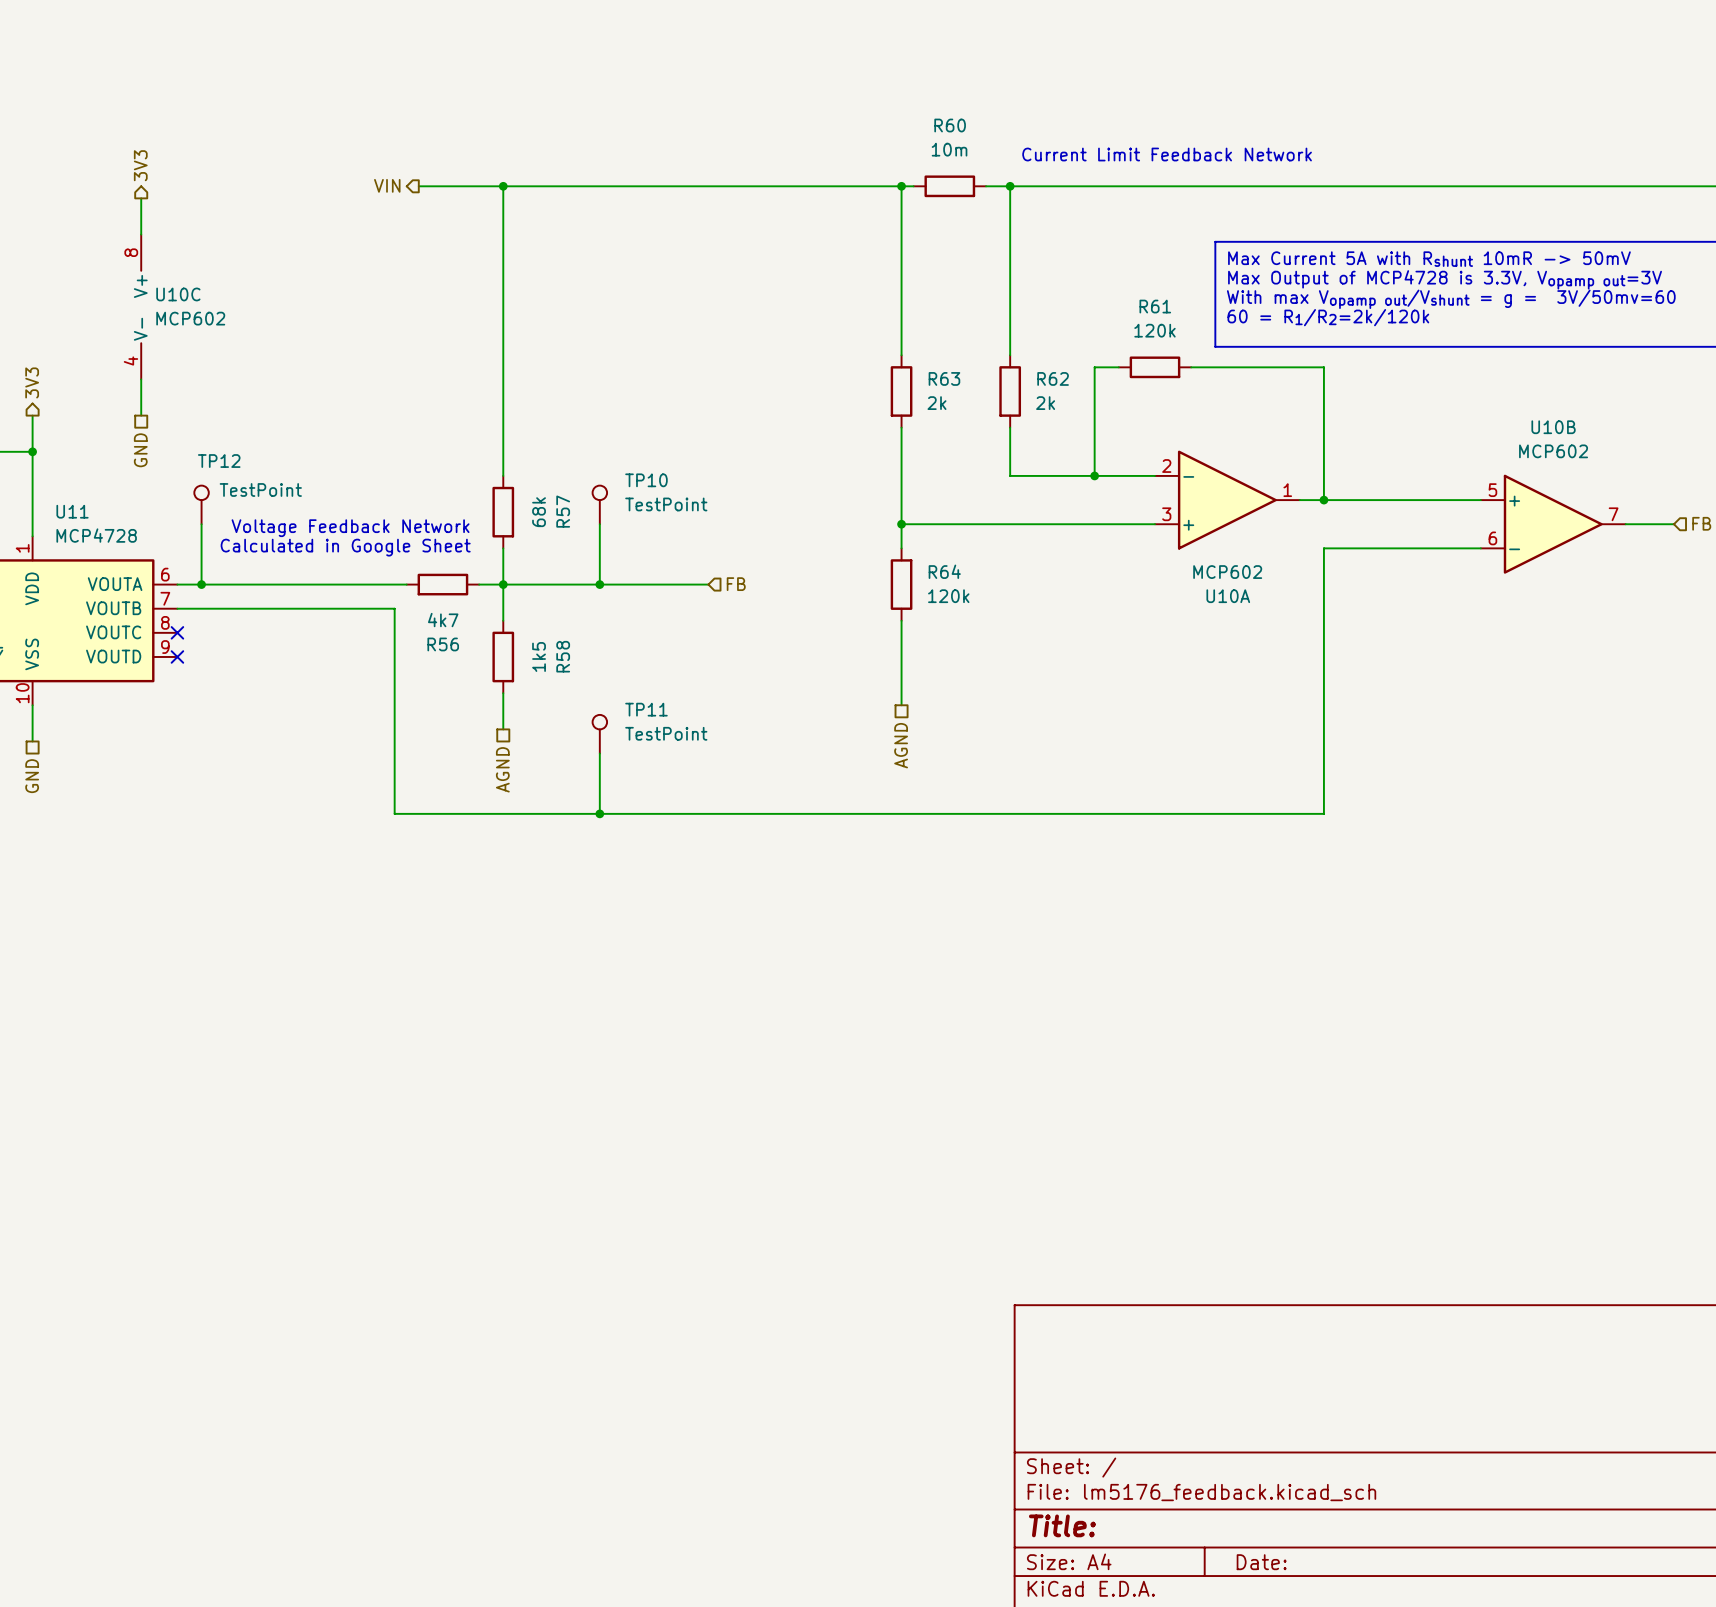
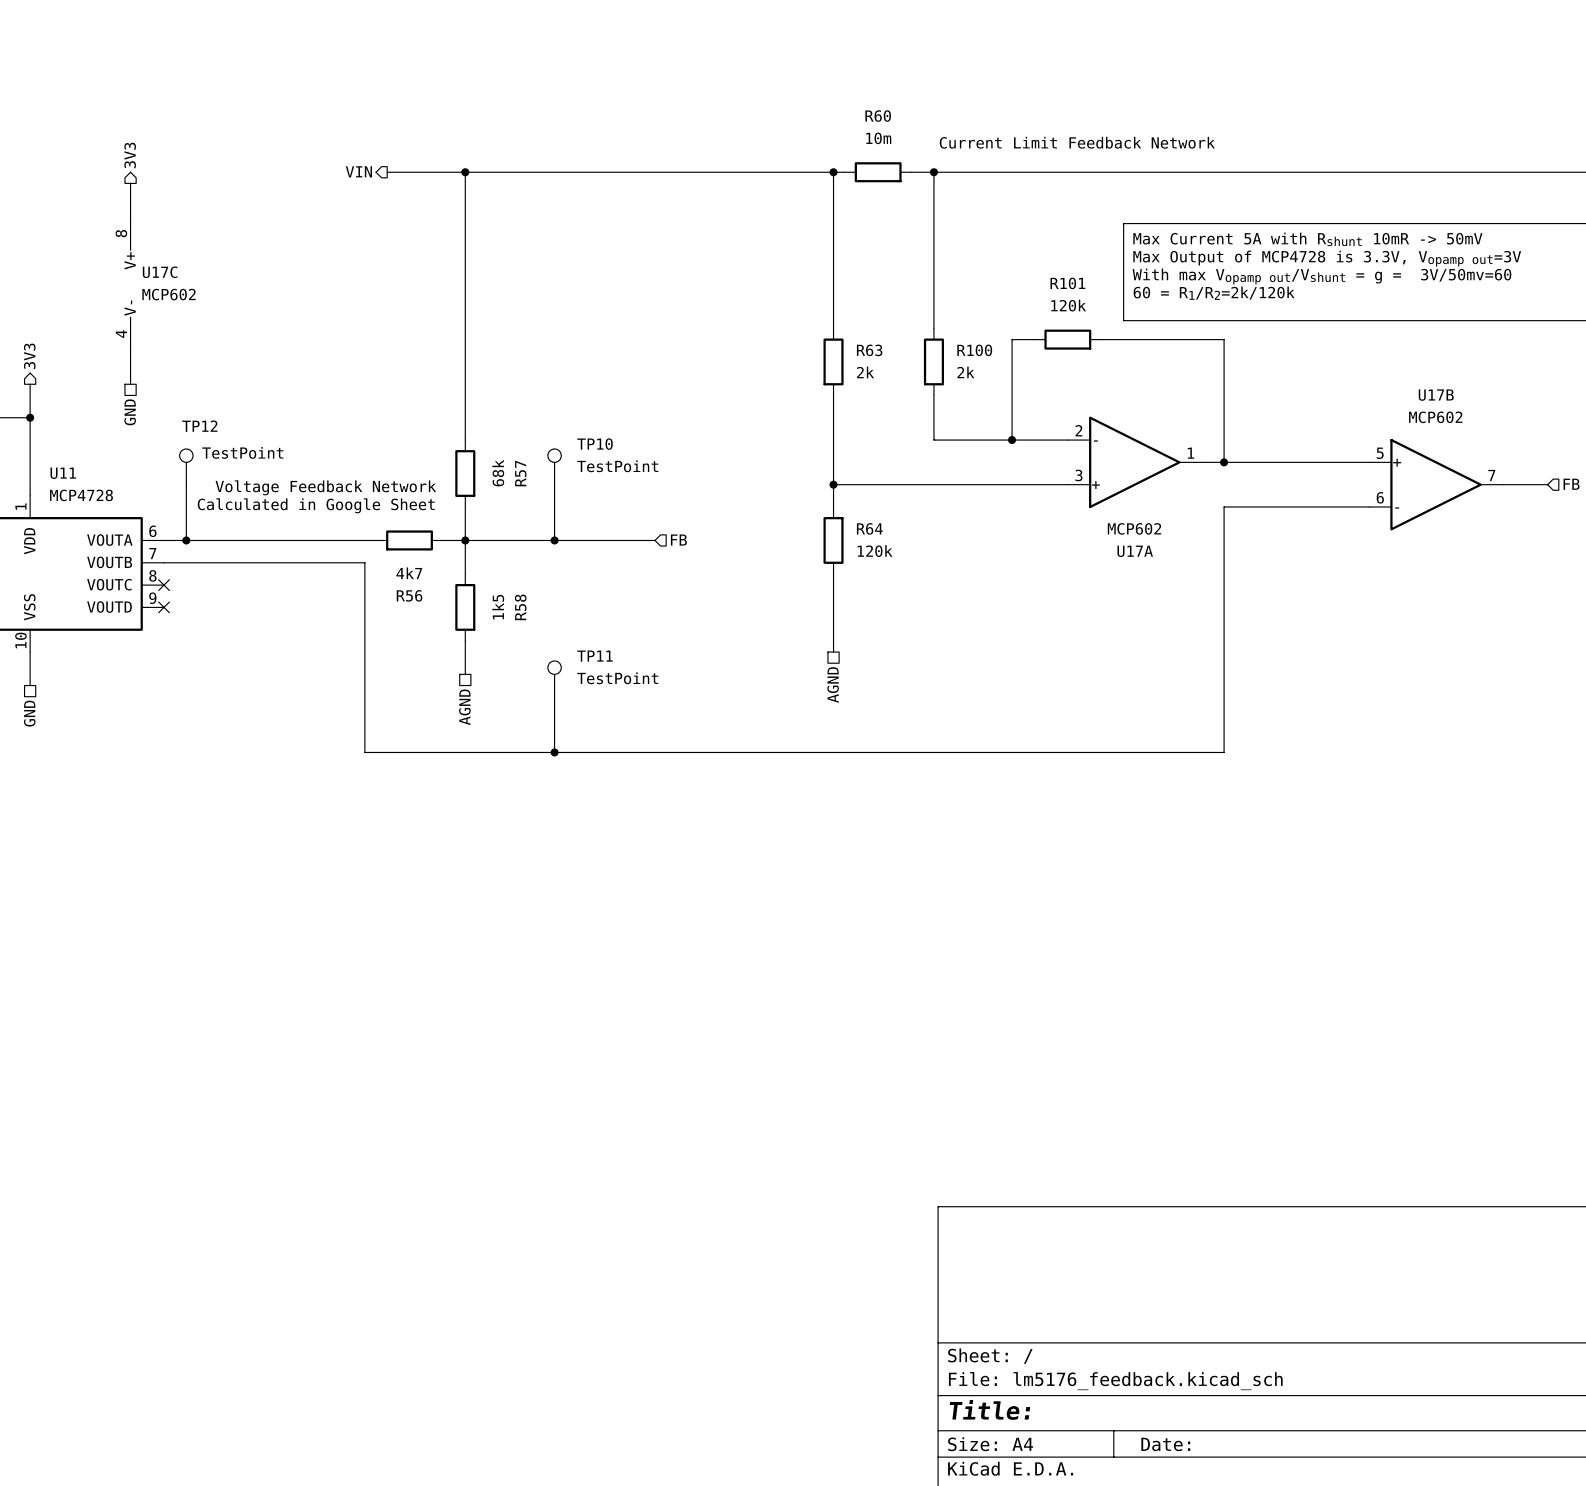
U10C name: U10C (178, 294) -> U17C (160, 272)
R61 name: R61 (1155, 306) -> R101 (1067, 283)
R62 name: R62 (1053, 378) -> R100 (974, 350)
U10B name: U10B (1553, 427) -> U17B (1436, 395)
U10A name: U10A (1228, 596) -> U17A (1135, 551)

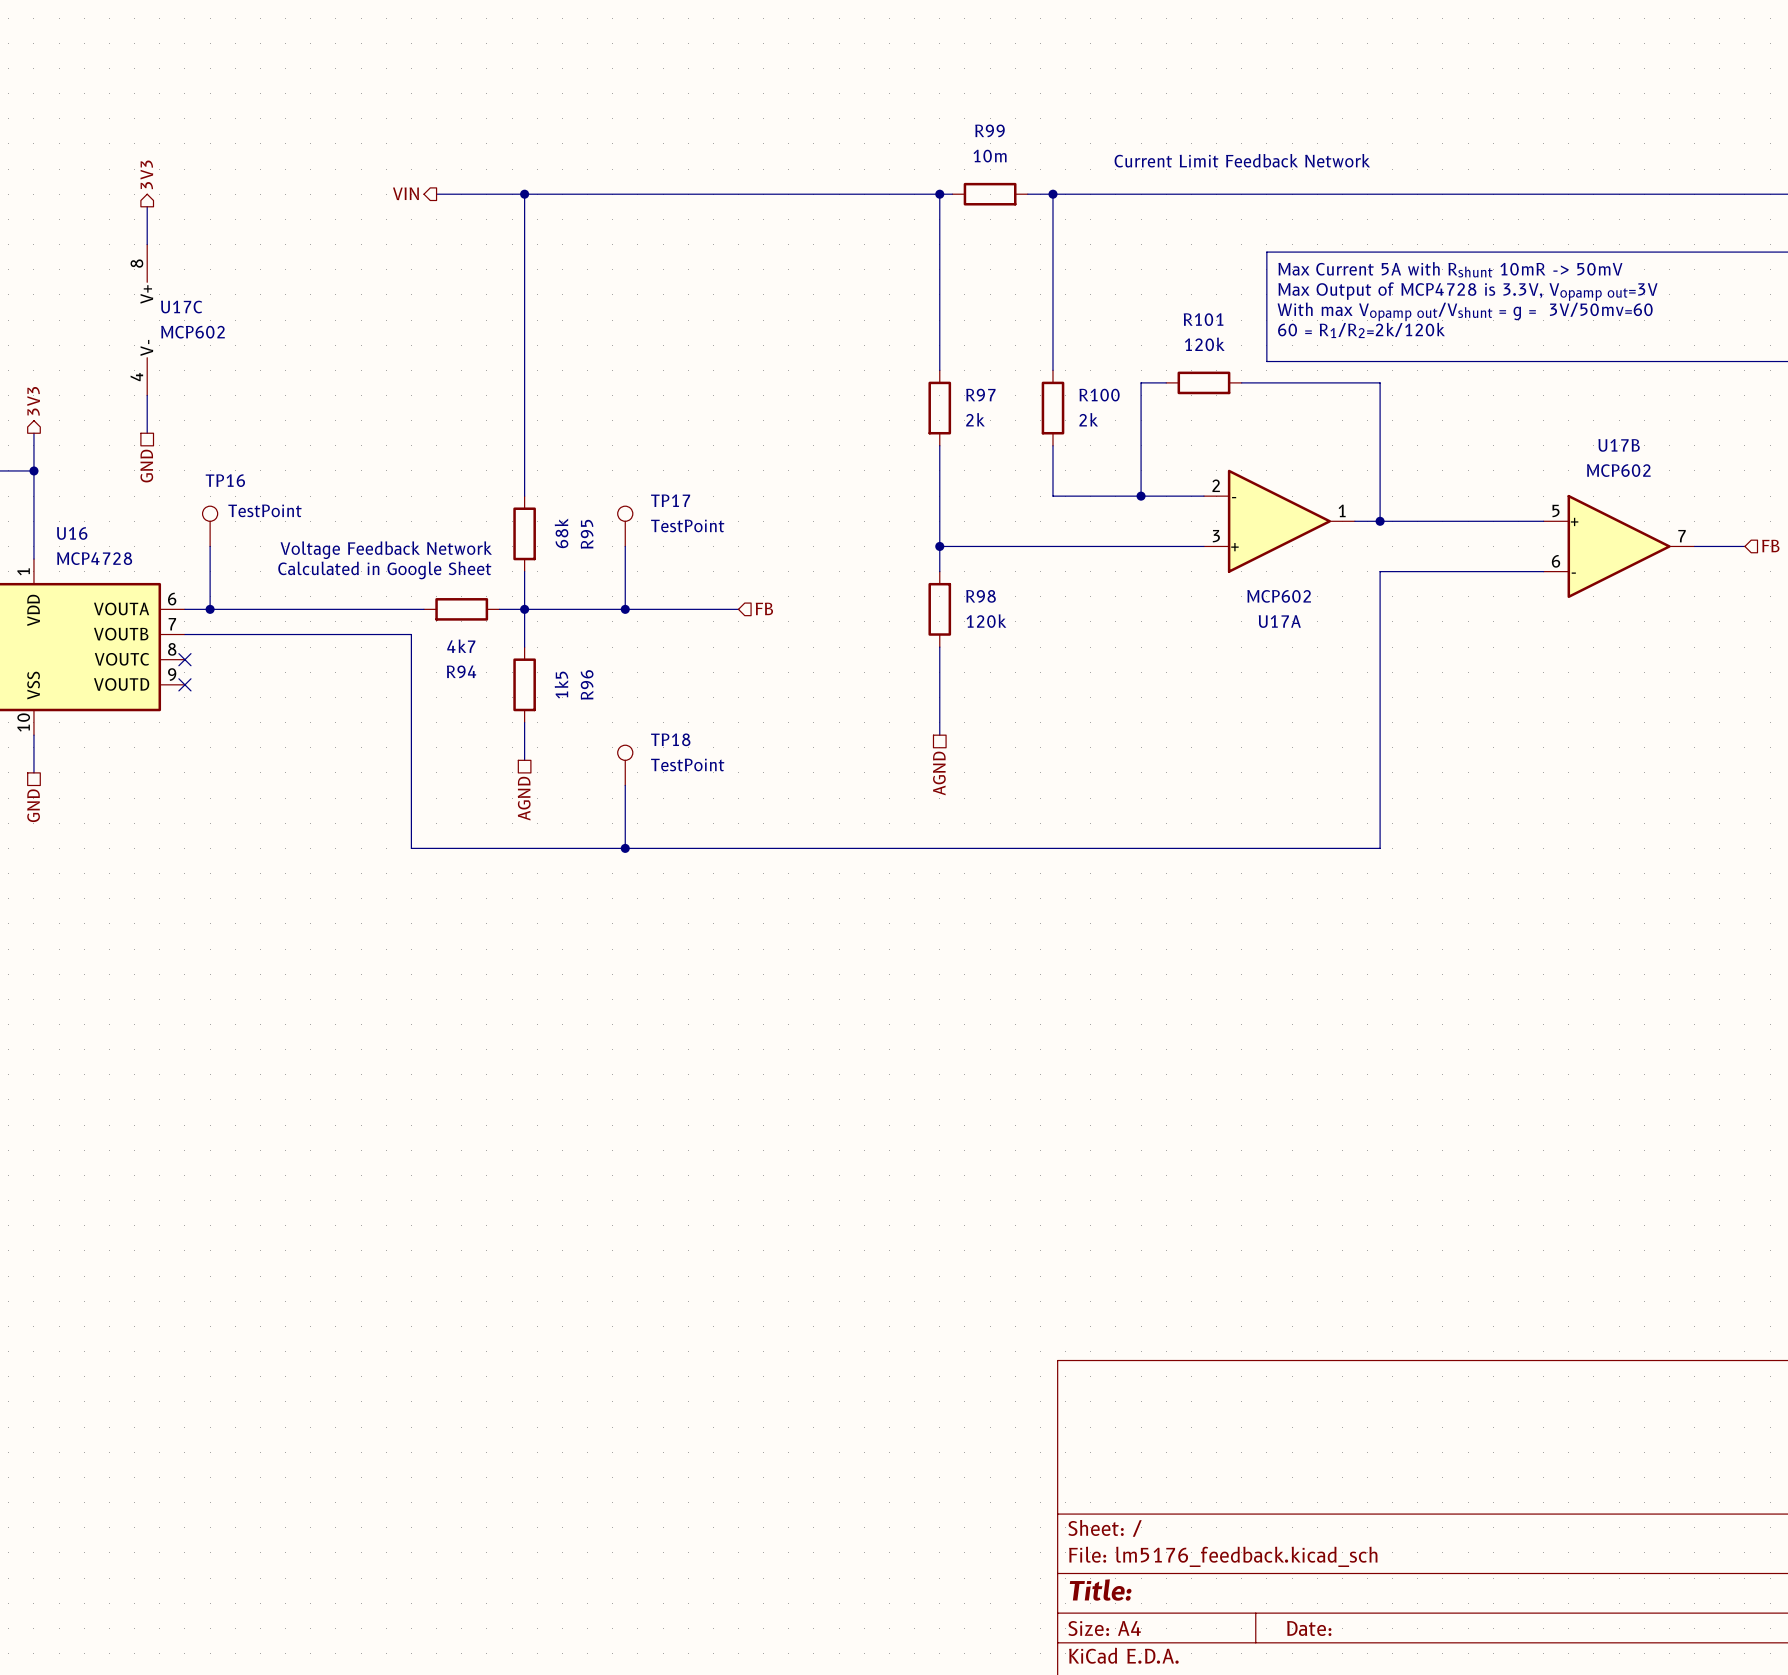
R60 name: R60 (878, 116) -> R99 (989, 130)
R63 name: R63 (869, 350) -> R97 (980, 395)
TP12 name: TP12 (199, 426) -> TP16 (225, 480)
TP10 name: TP10 (595, 444) -> TP17 (670, 500)
U11 name: U11 (63, 473) -> U16 (72, 533)
R57 name: R57 (520, 473) -> R95 (587, 534)
R64 name: R64 (869, 528) -> R98 (981, 596)
R56 name: R56 (409, 595) -> R94 (461, 671)
R58 name: R58 (520, 607) -> R96 (587, 684)
TP11 name: TP11 (594, 656) -> TP18 (670, 739)

